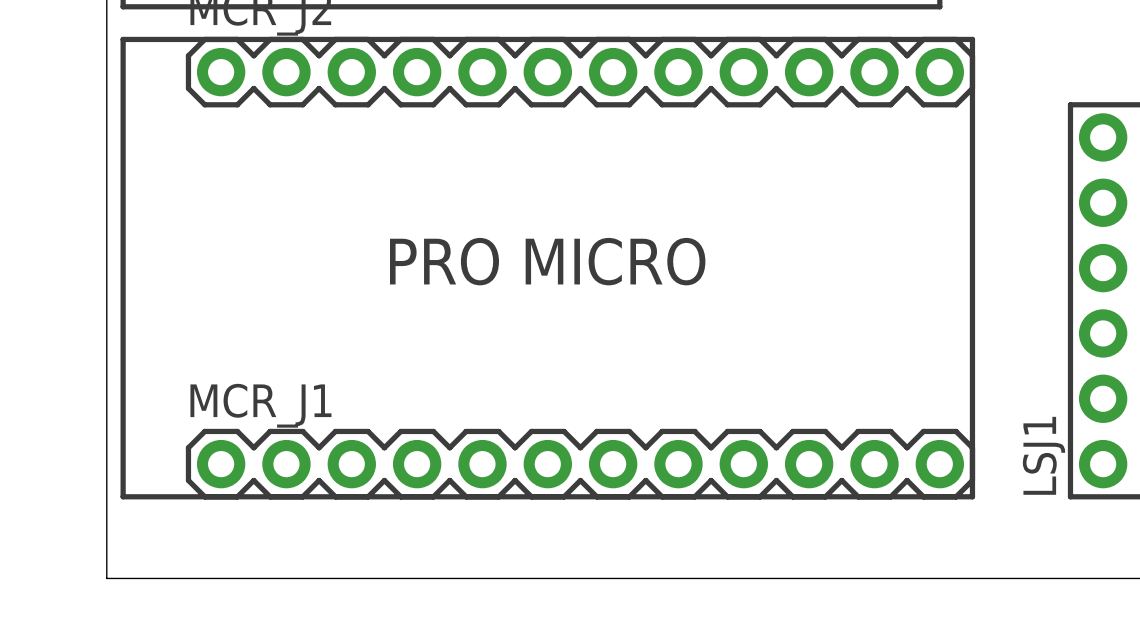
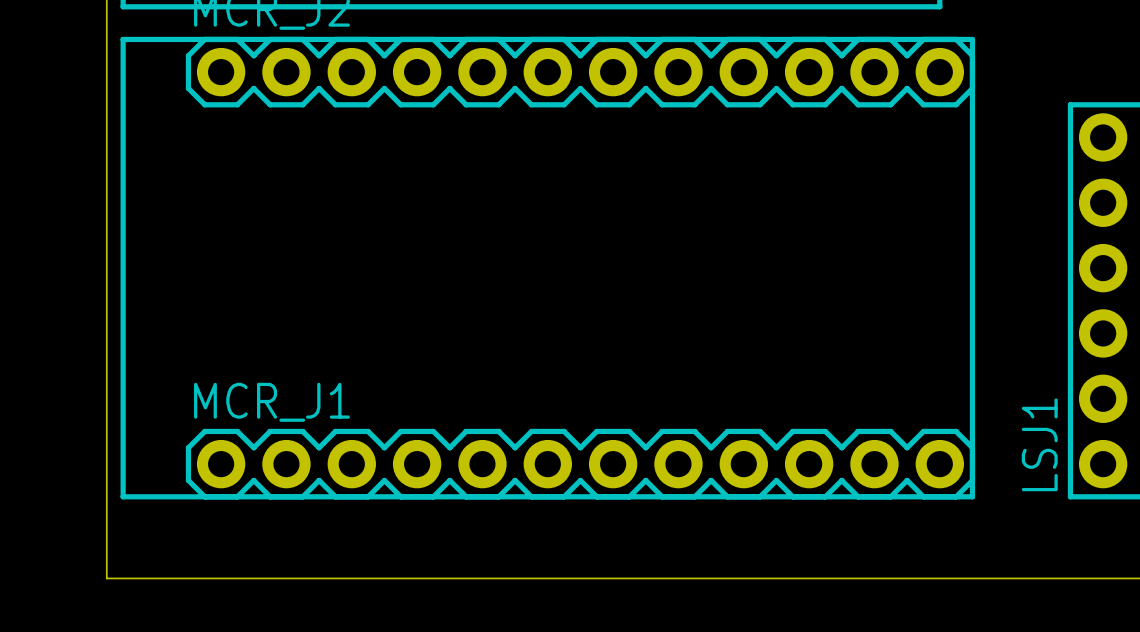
text: PRO MICRO (547, 261) -> none

